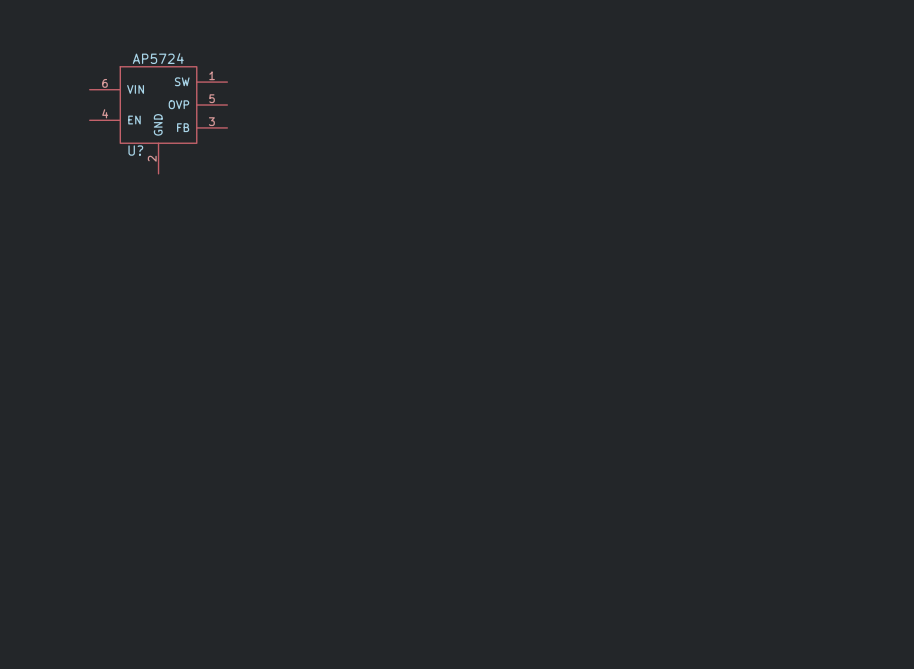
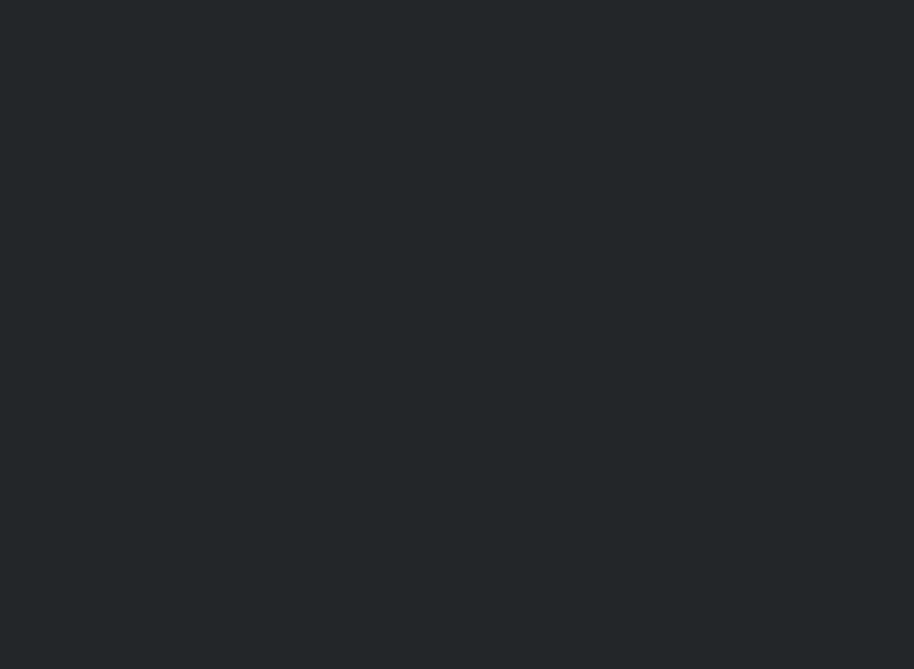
U?: AP5724 (158, 120) -> none

